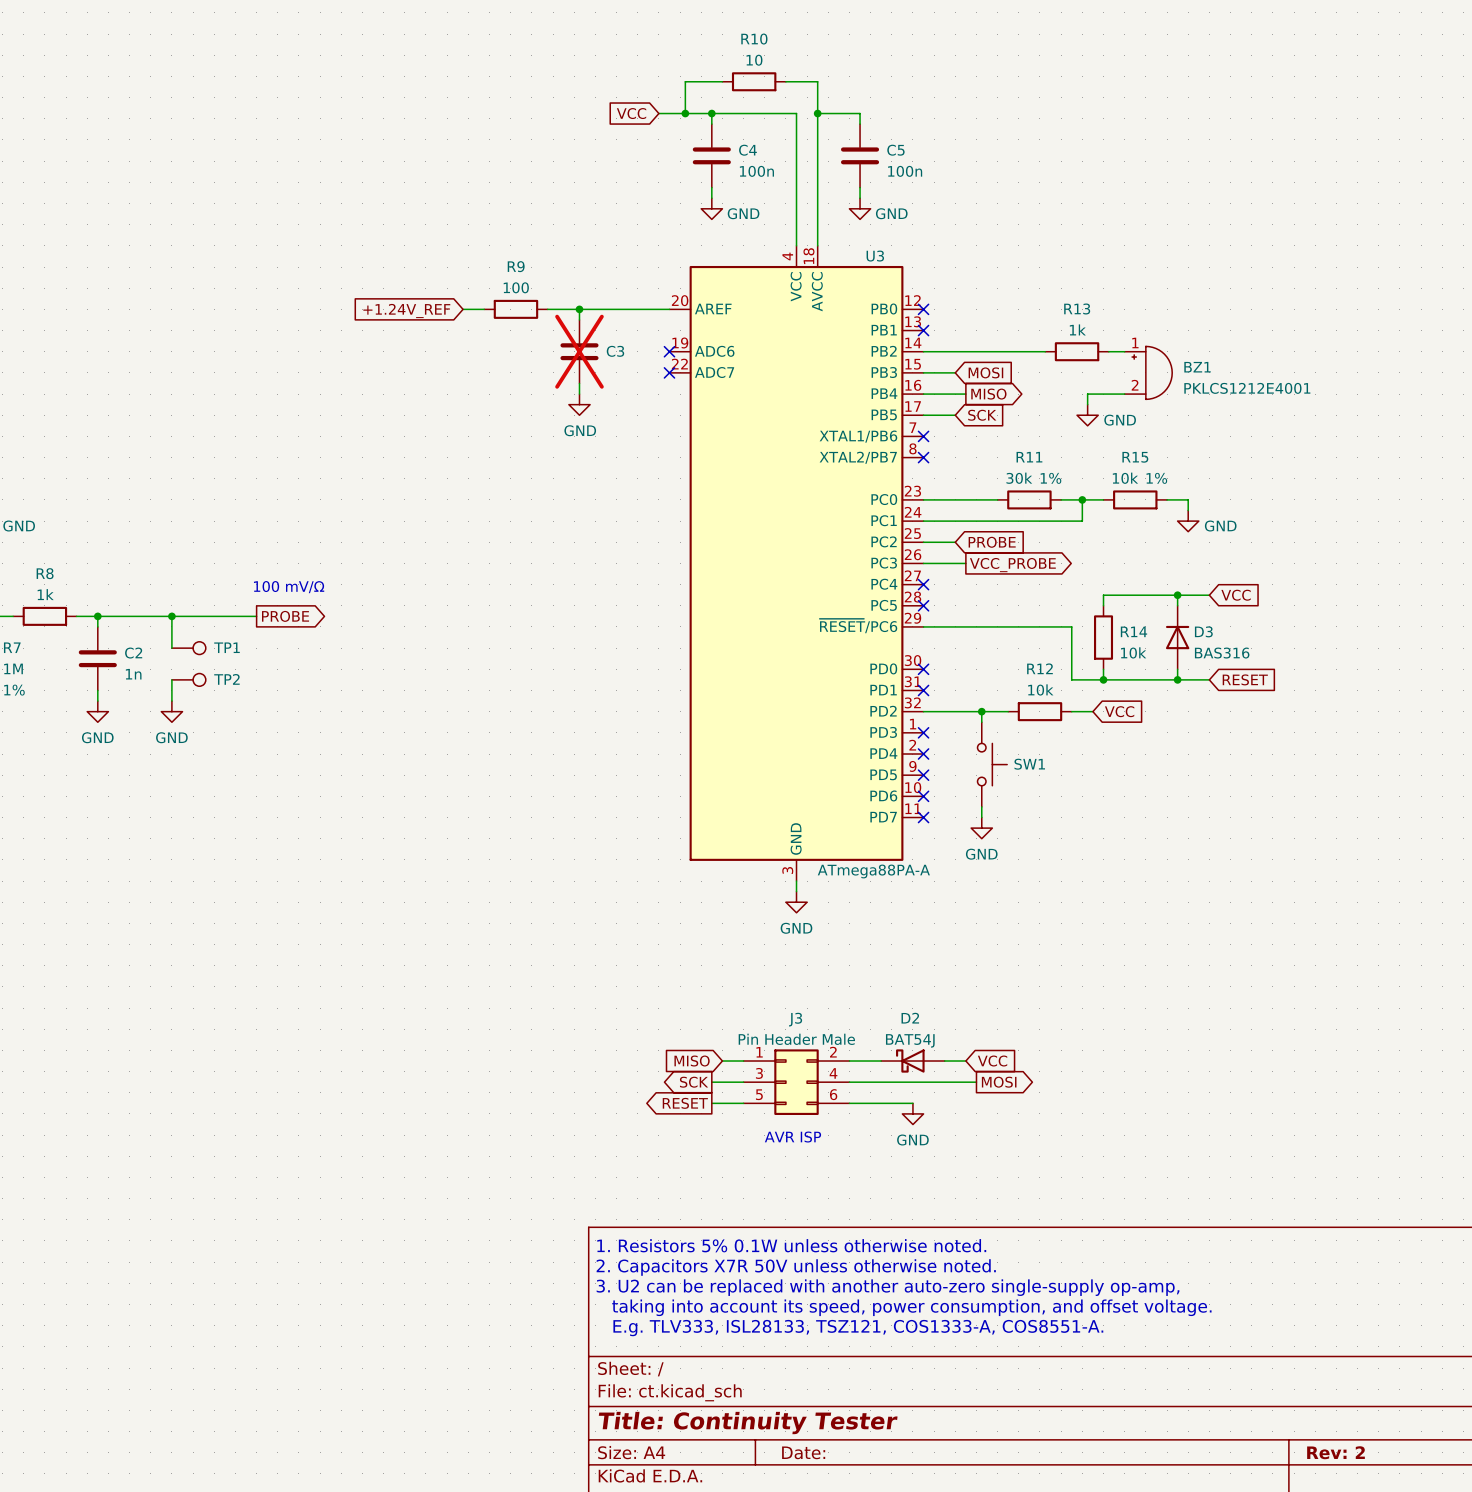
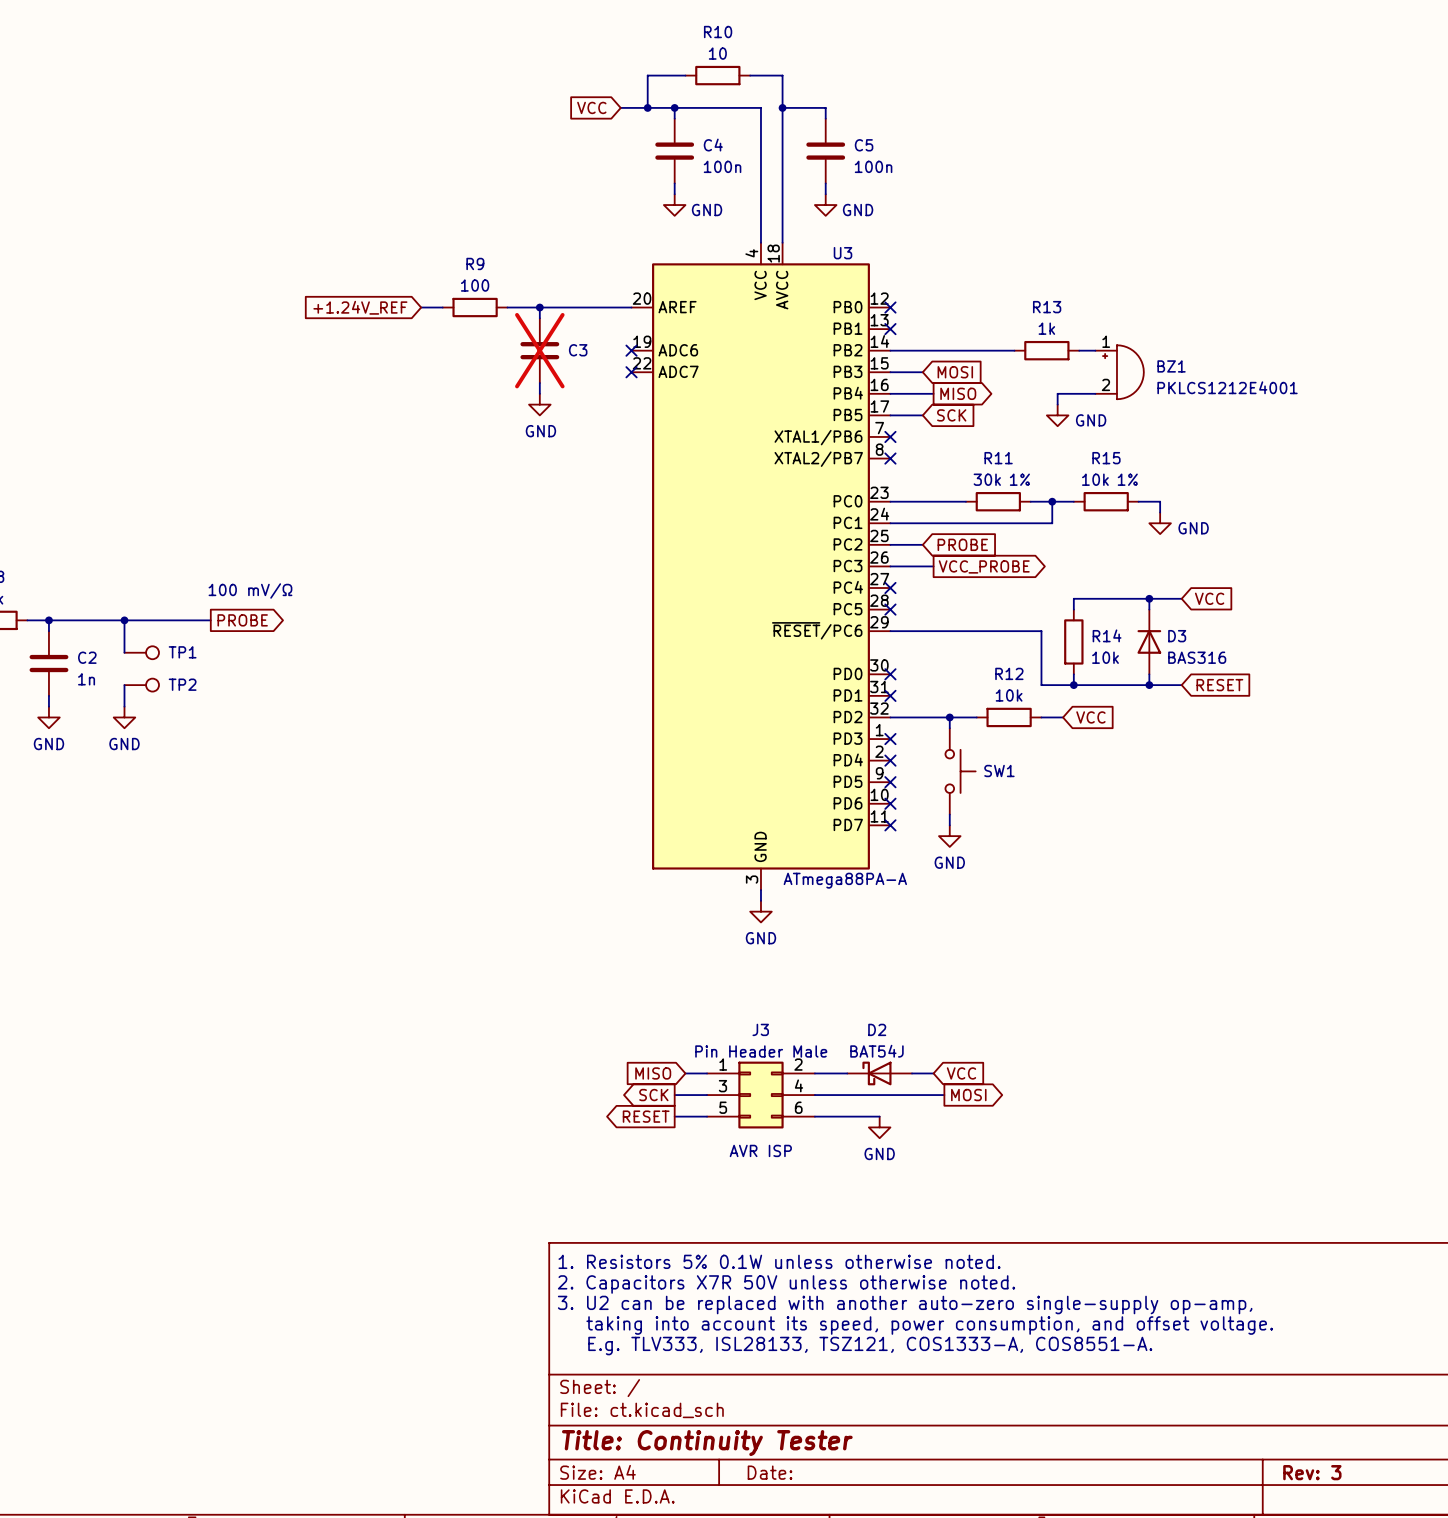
title block: Rev: 2 (1336, 1452) -> Rev: 3 (1312, 1472)

